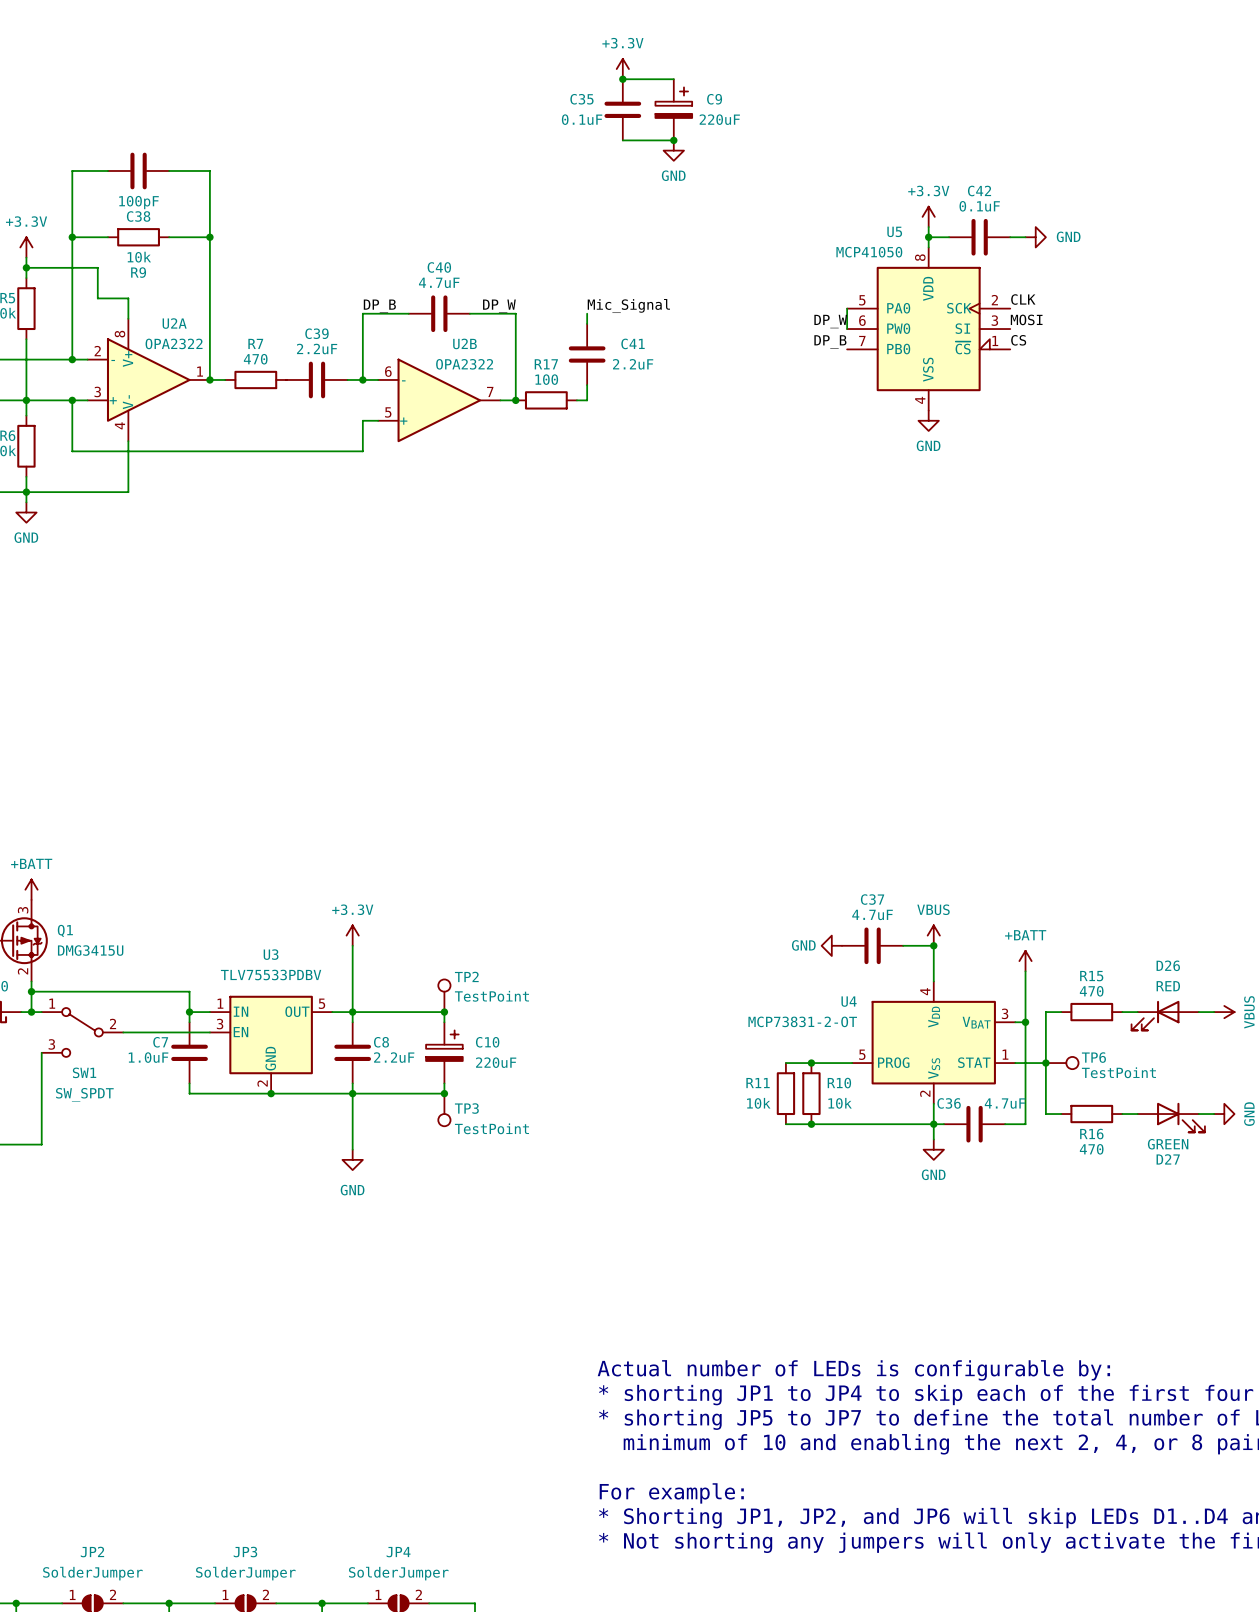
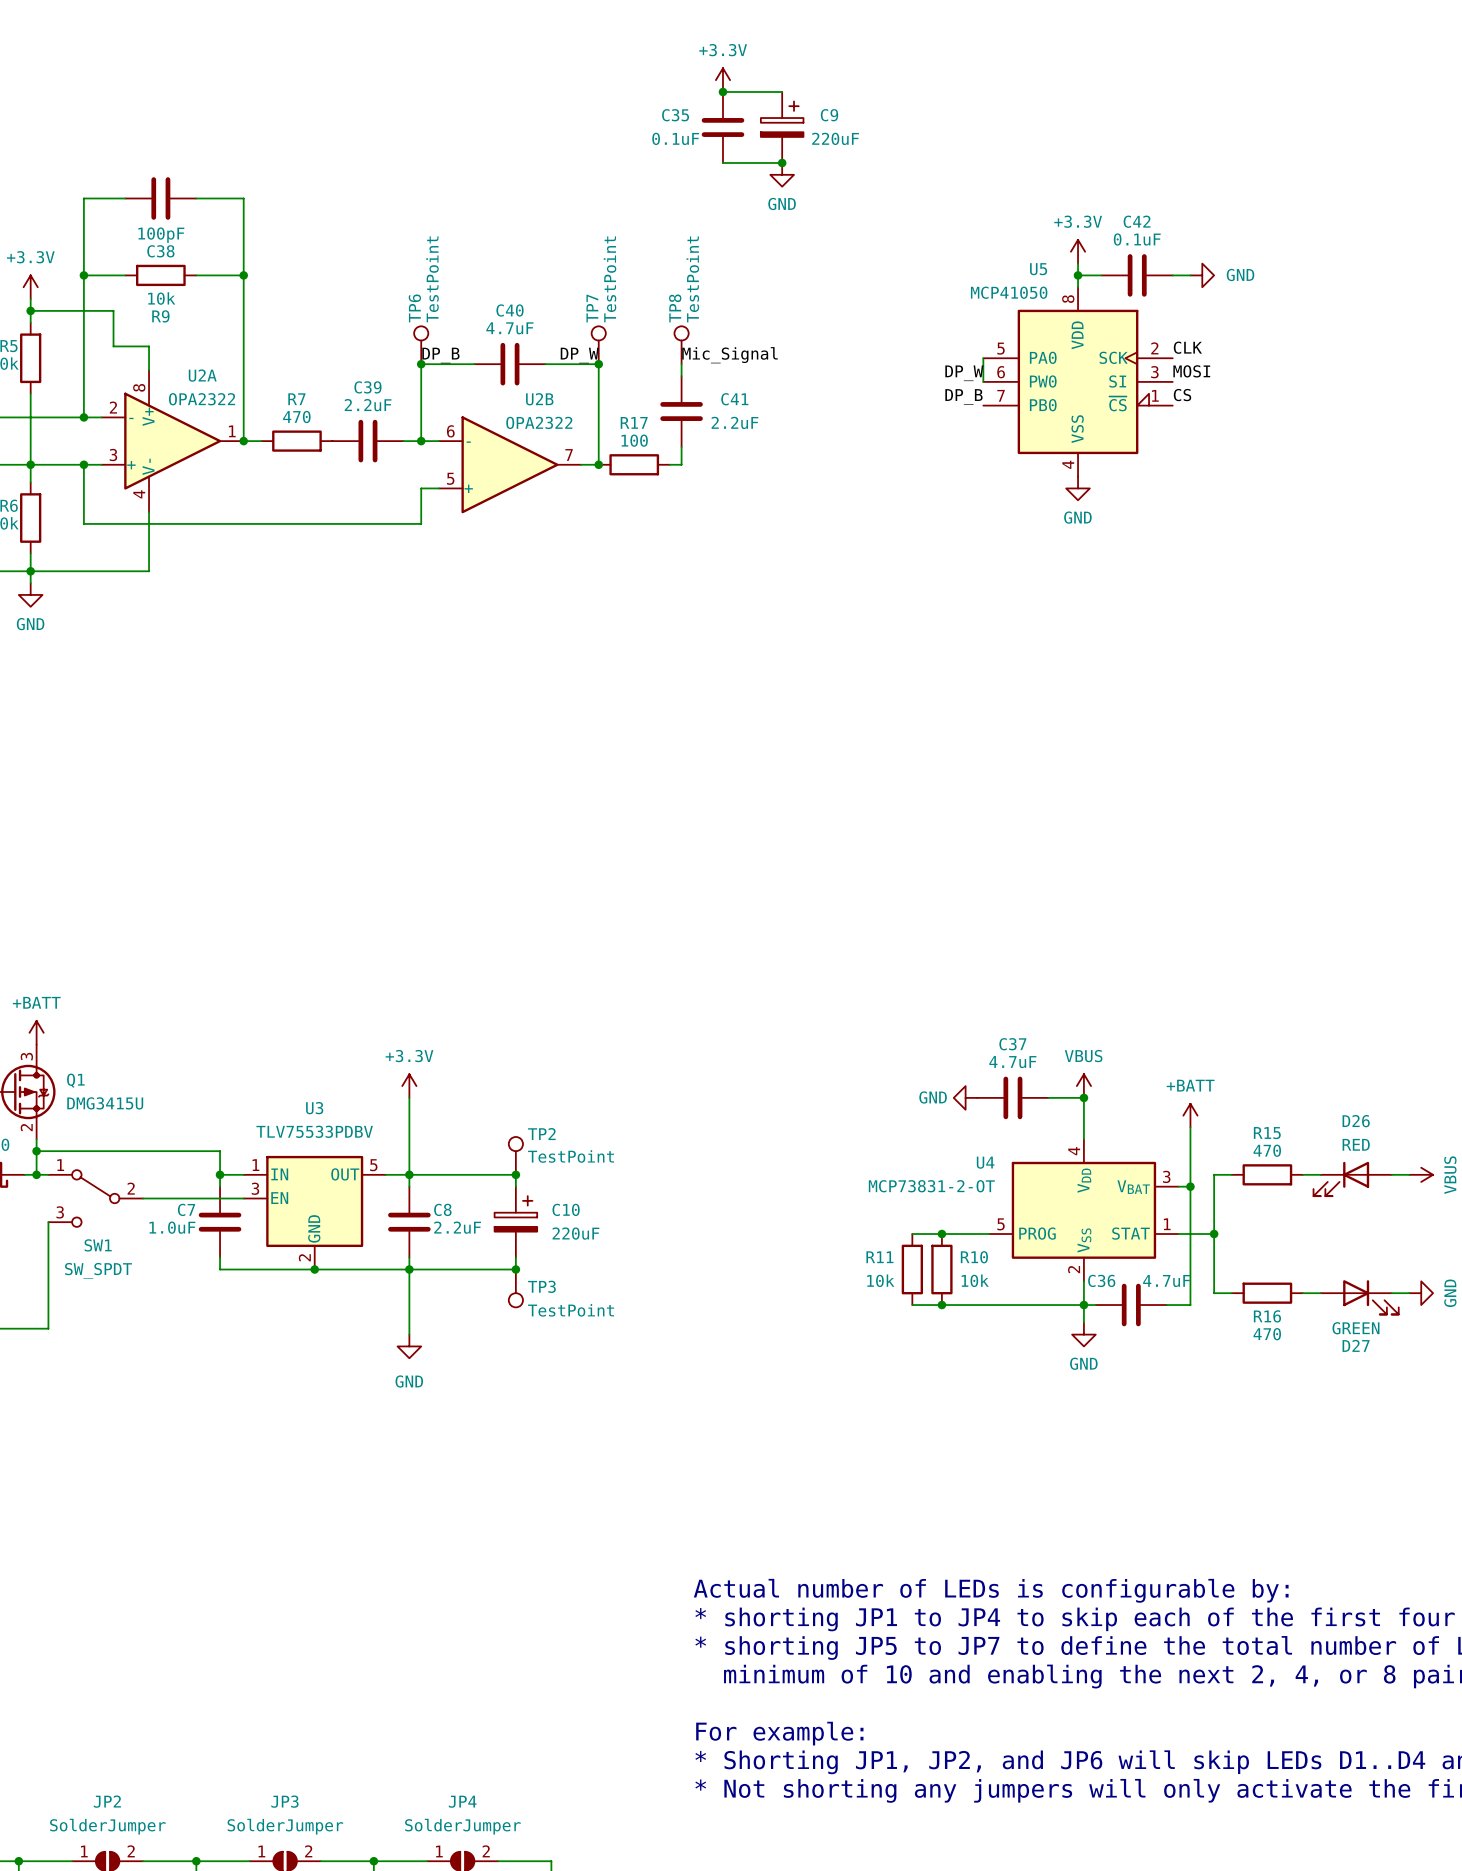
TP7: none -> TestPoint (598, 345)
TP8: none -> TestPoint (681, 345)
junction: none -> (421, 364)
junction: none -> (598, 364)
TP6 position: (1062, 1063) -> (421, 345)
TP6 rotation: 0° (1072, 1063) -> 90° counterclockwise (421, 333)

